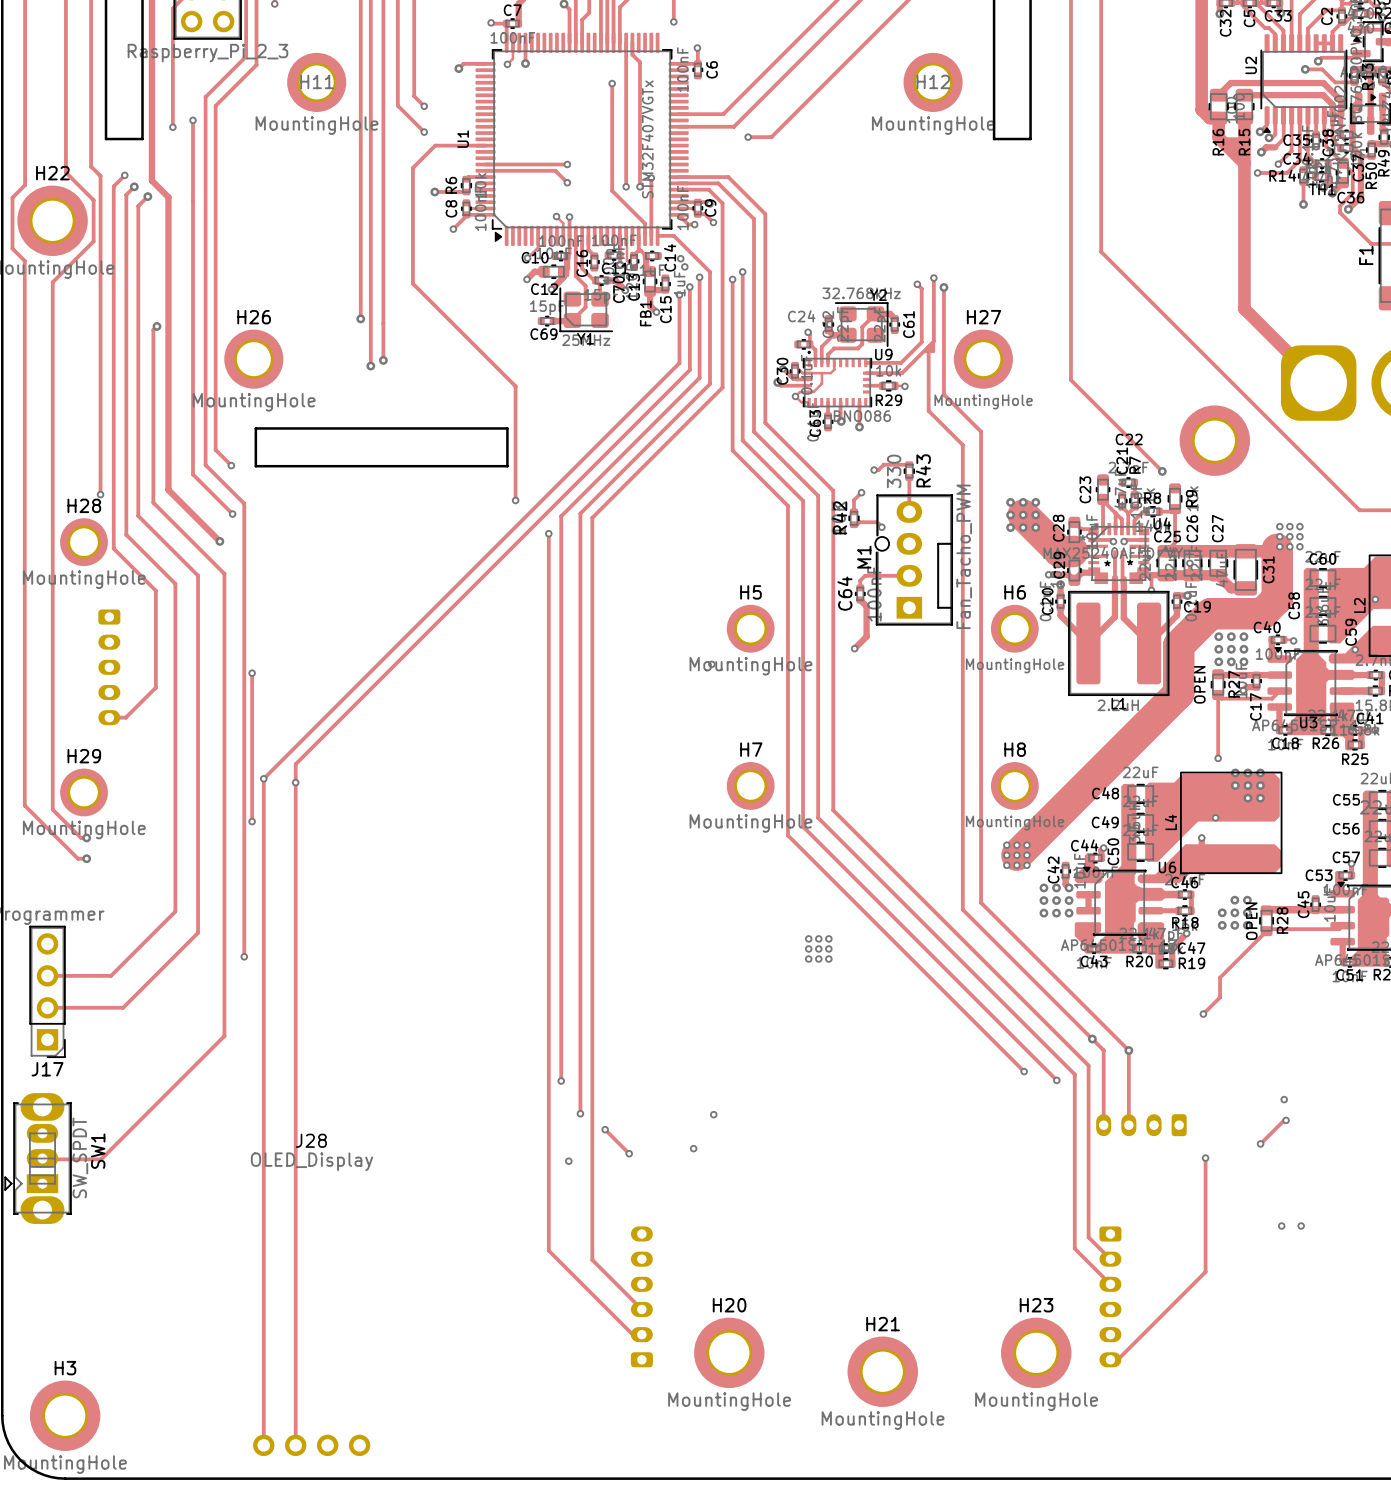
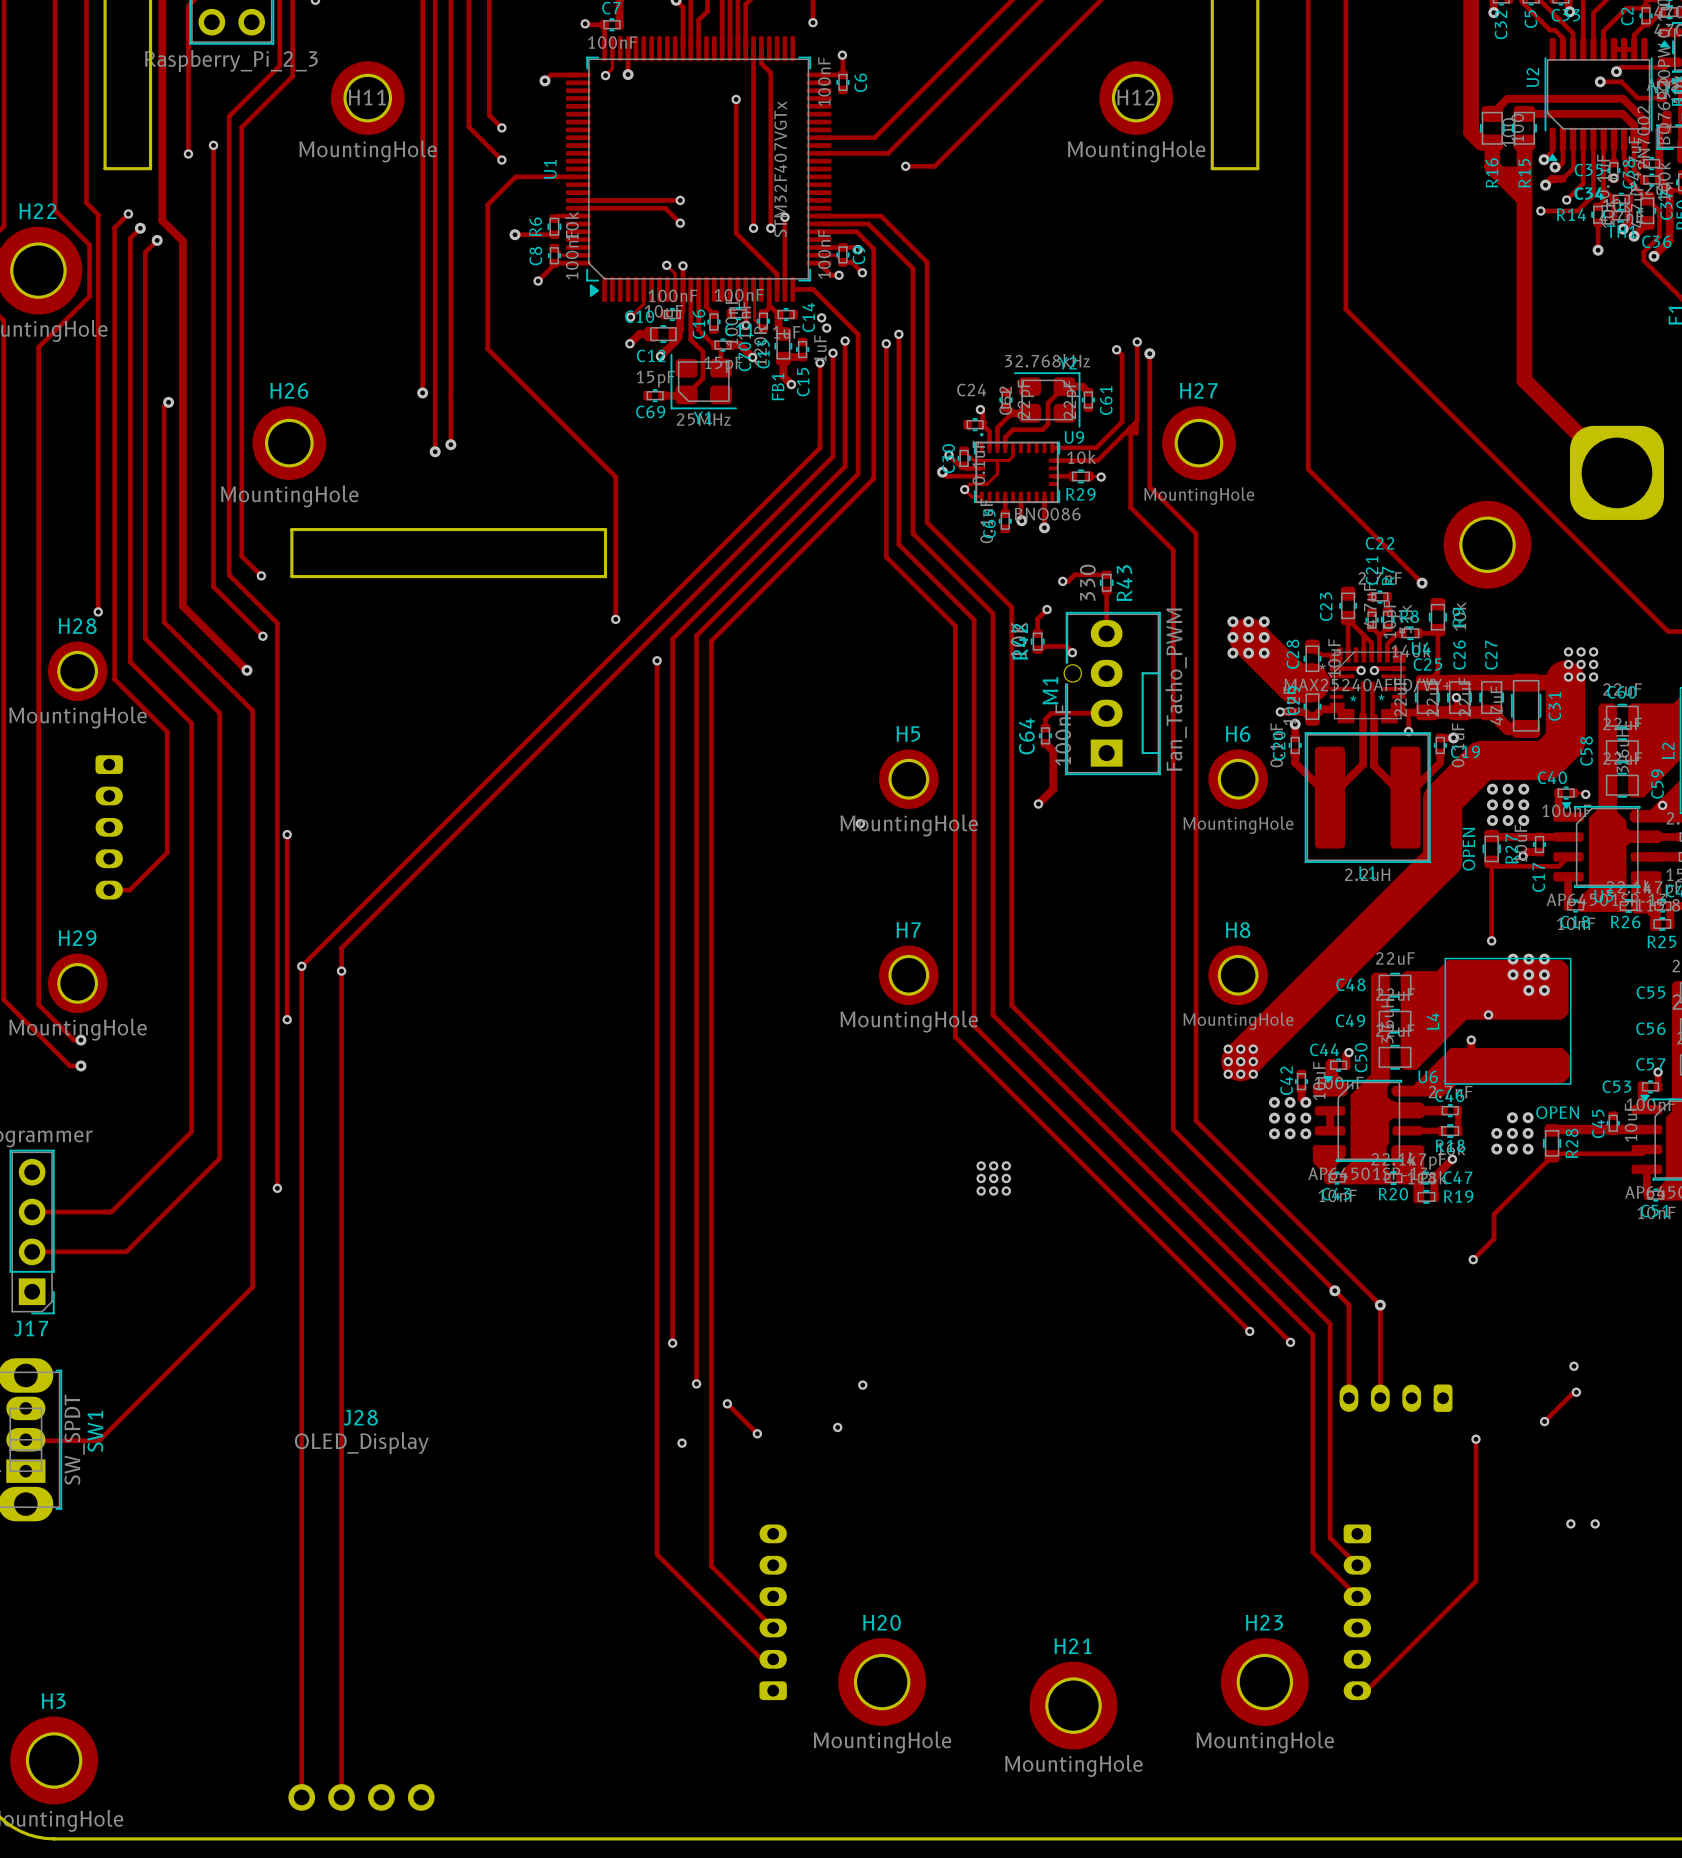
R28 value rotation: 0° (1251, 921) -> 90° clockwise (1557, 1112)

